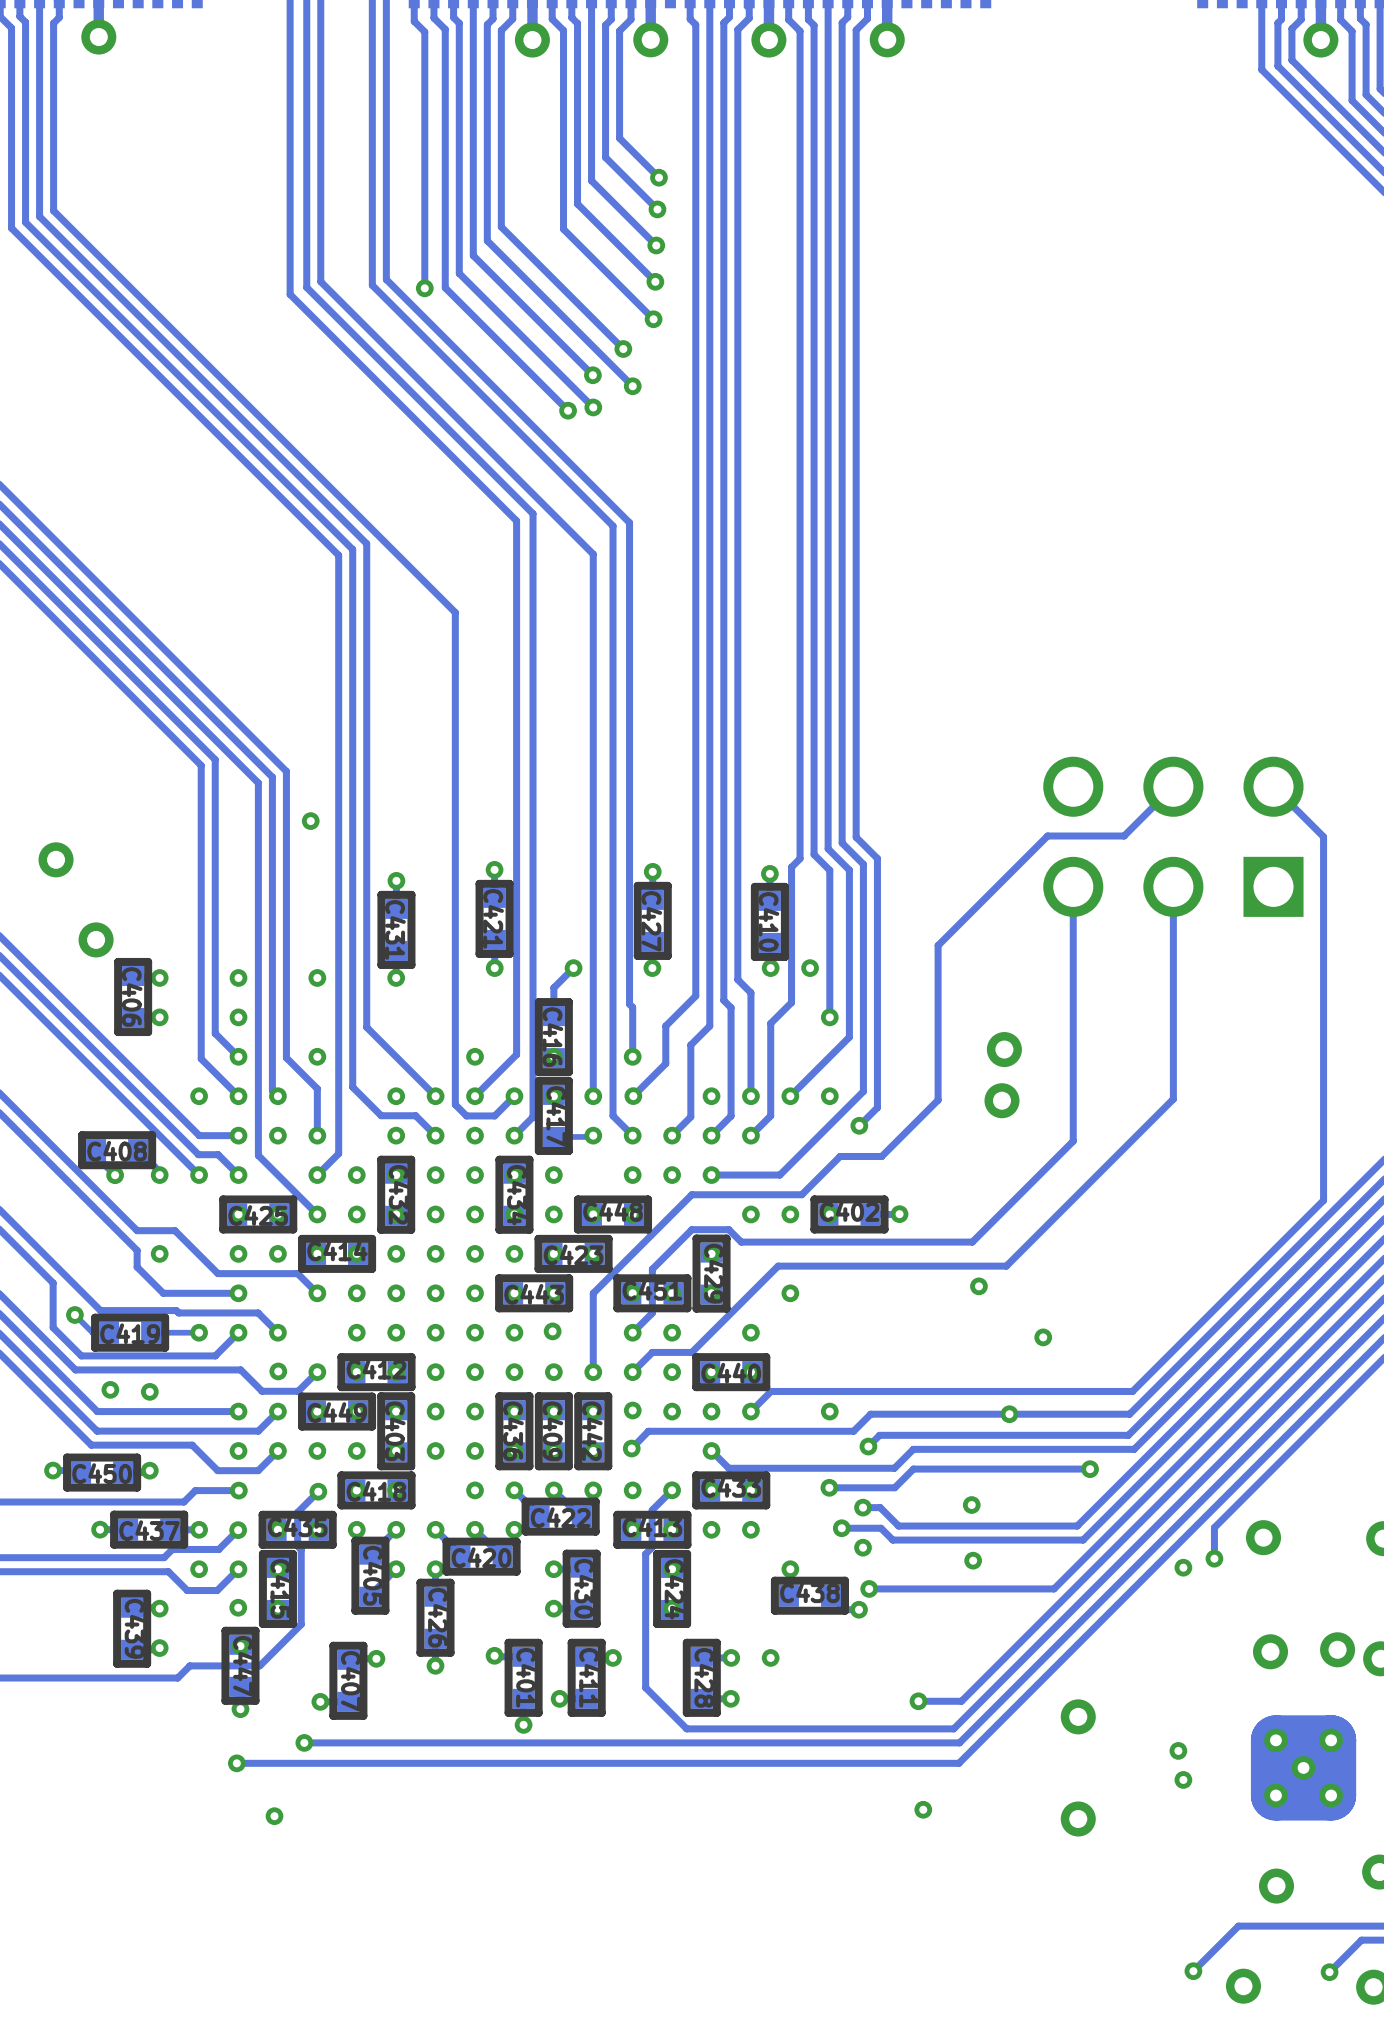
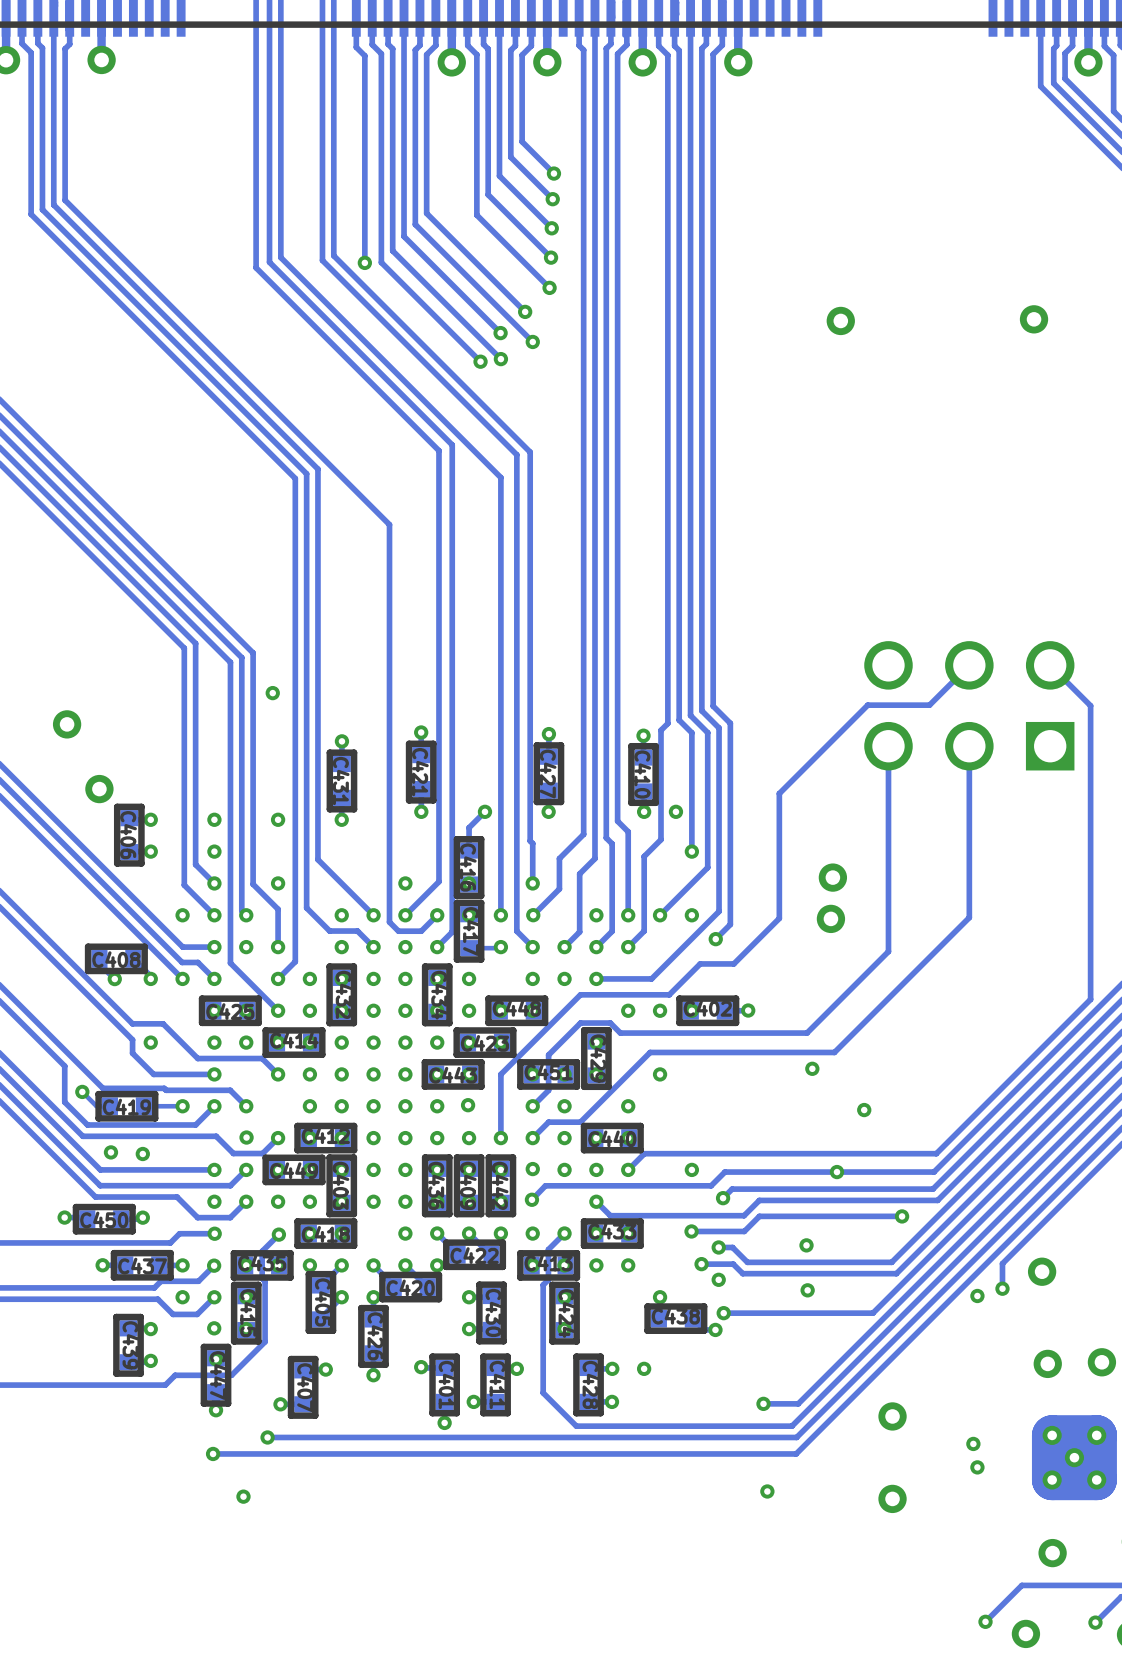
via: none -> (1034, 319)
via: none -> (840, 320)

